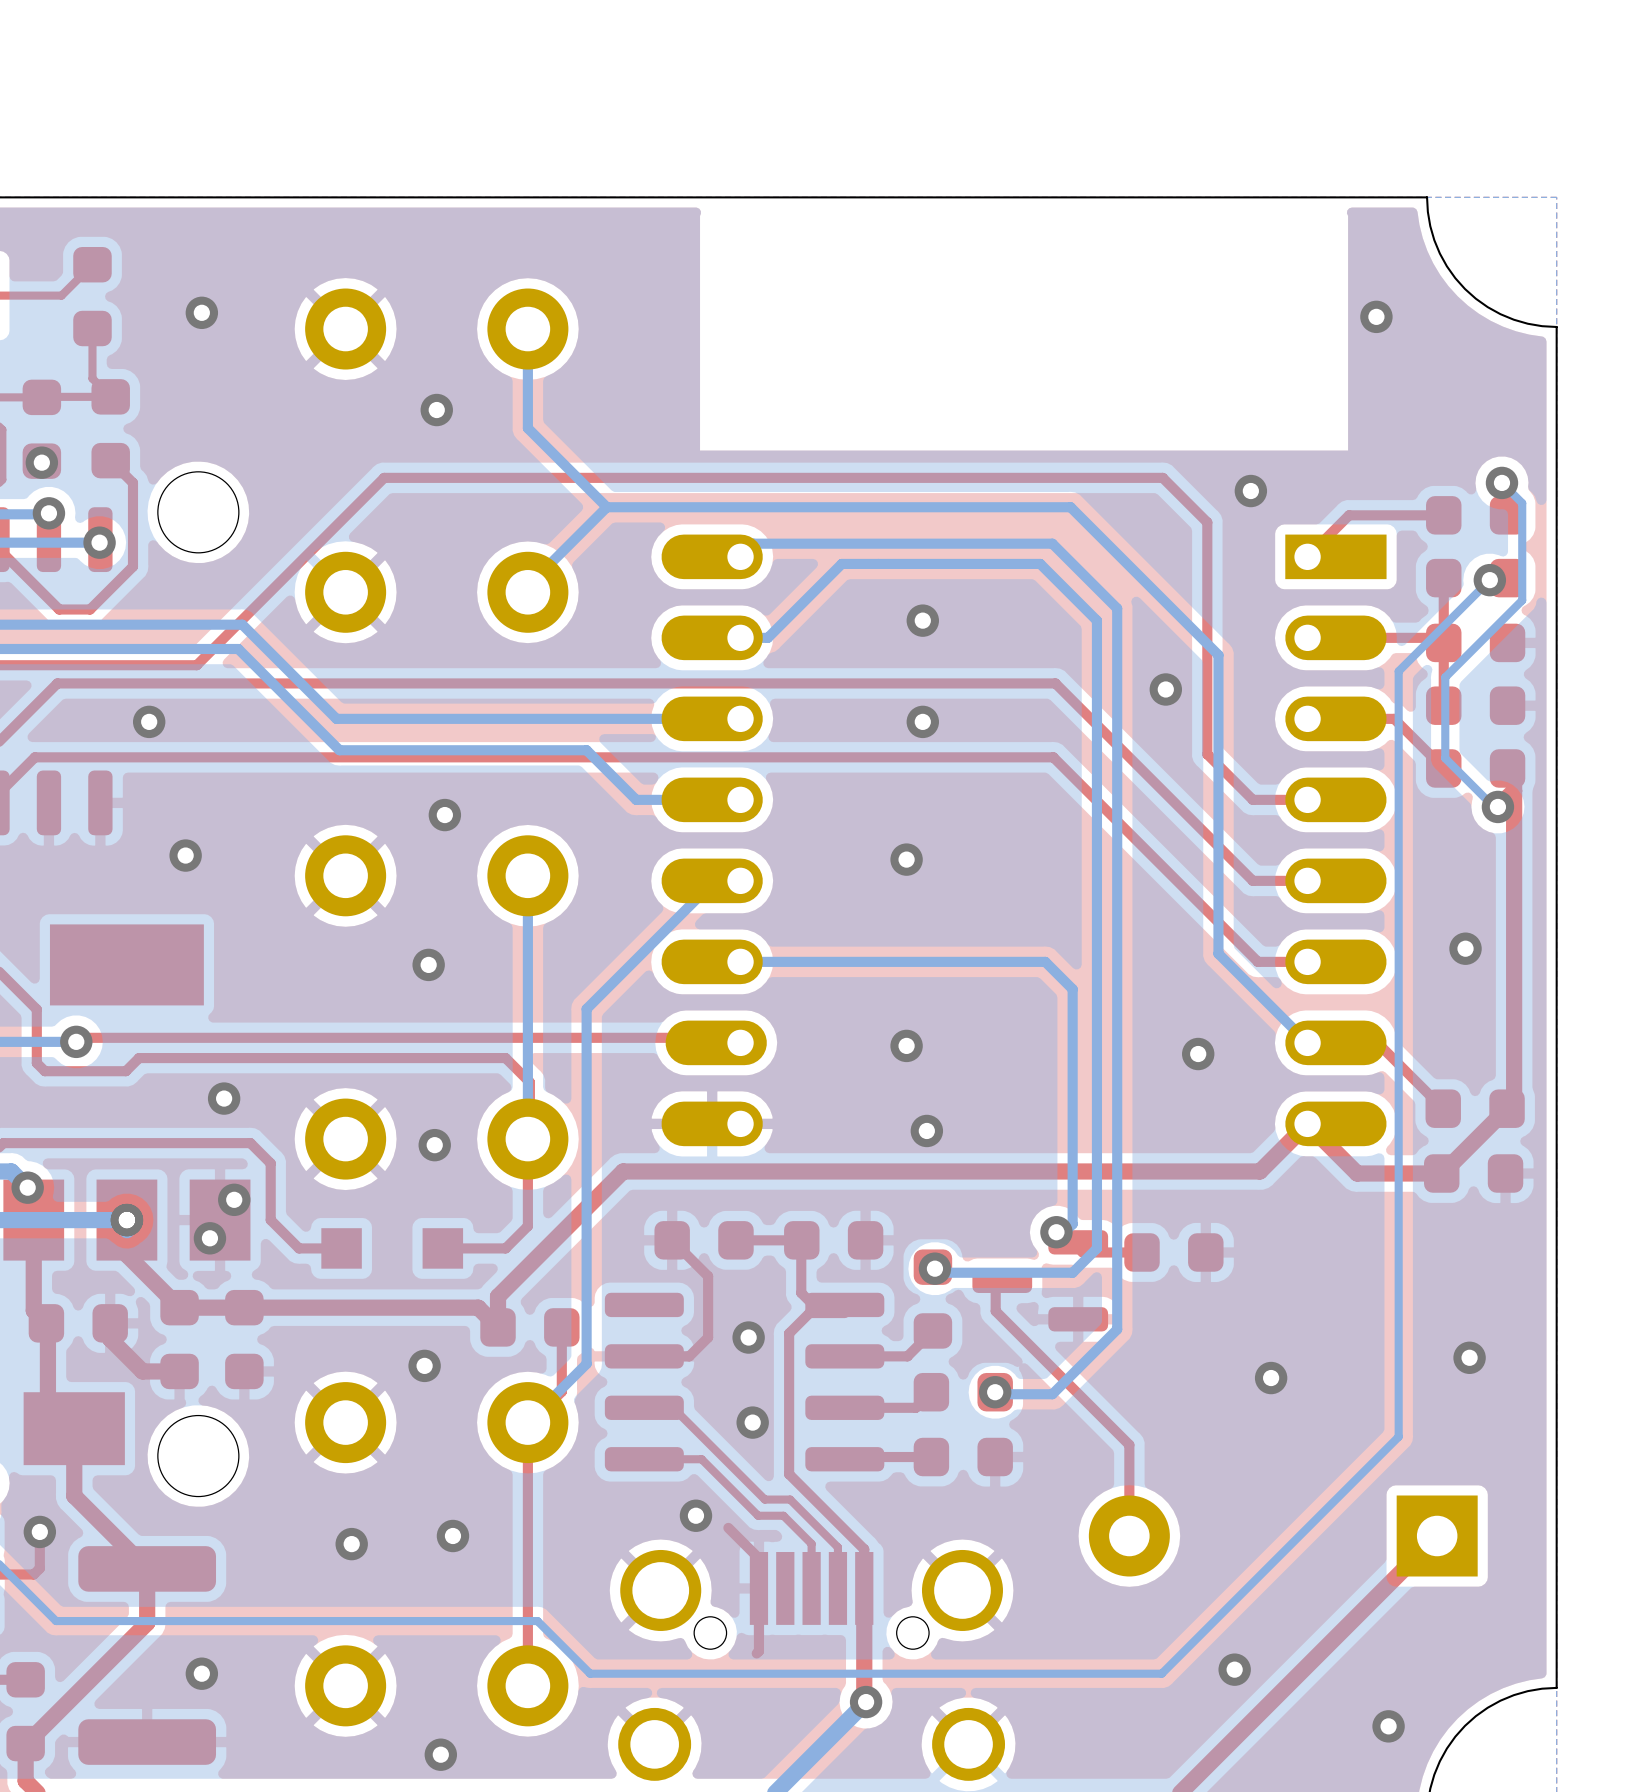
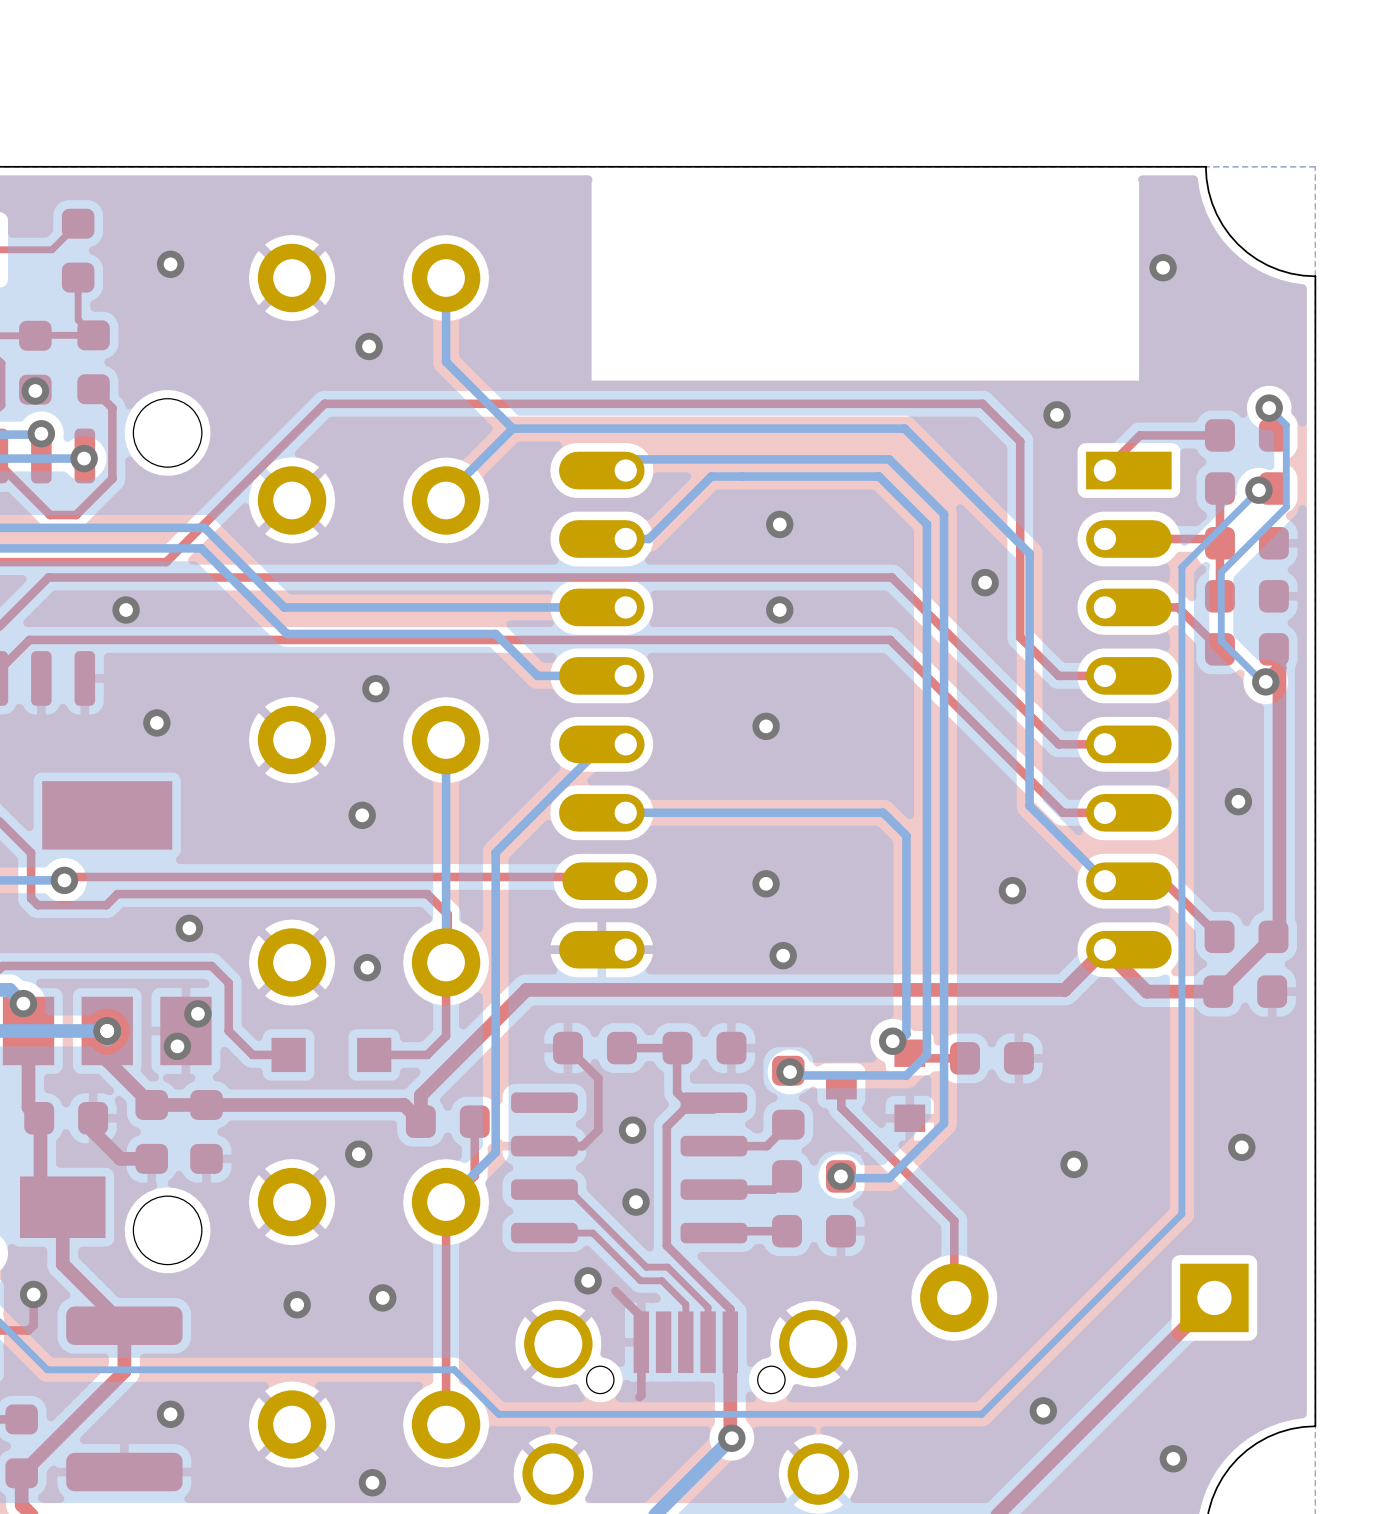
part footprint: [972, 1230, 1109, 1332] -> [825, 1039, 926, 1132]

